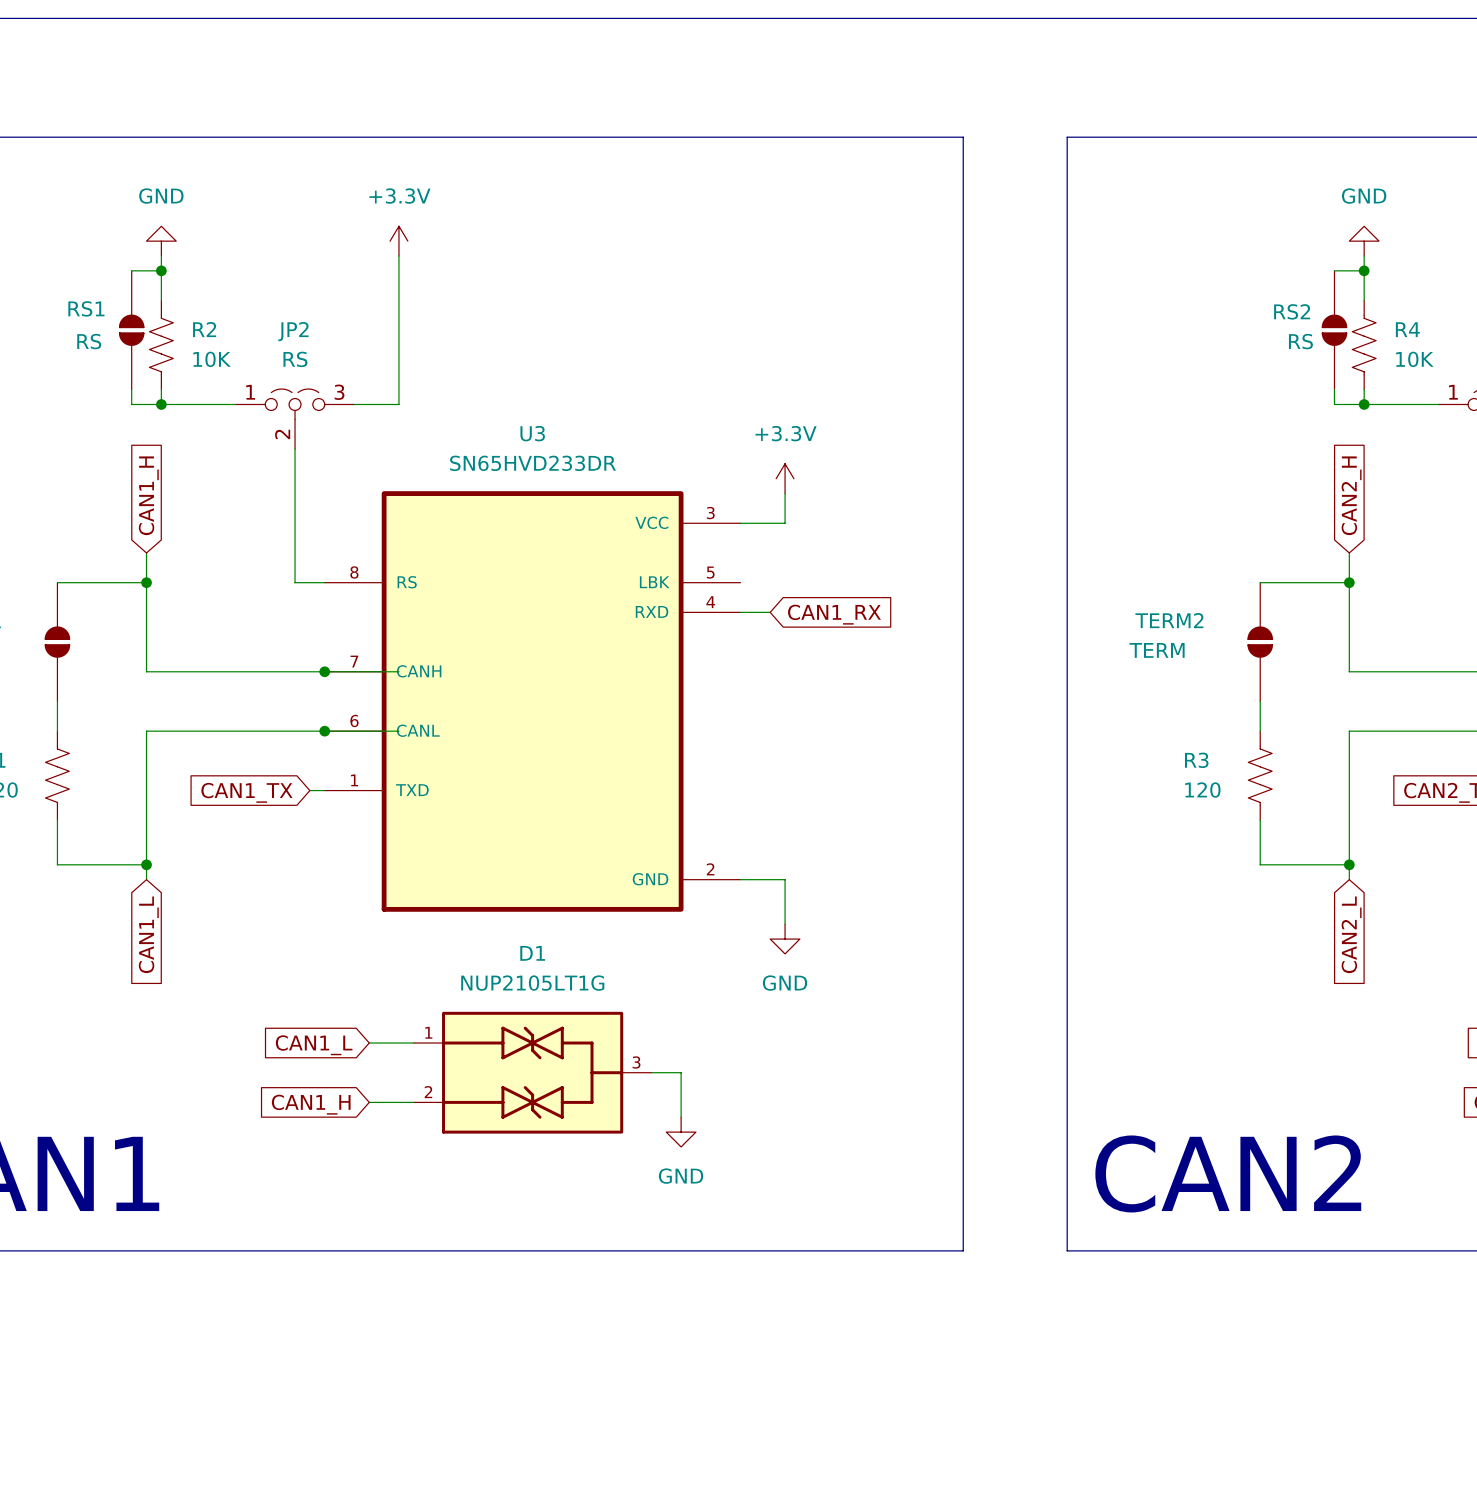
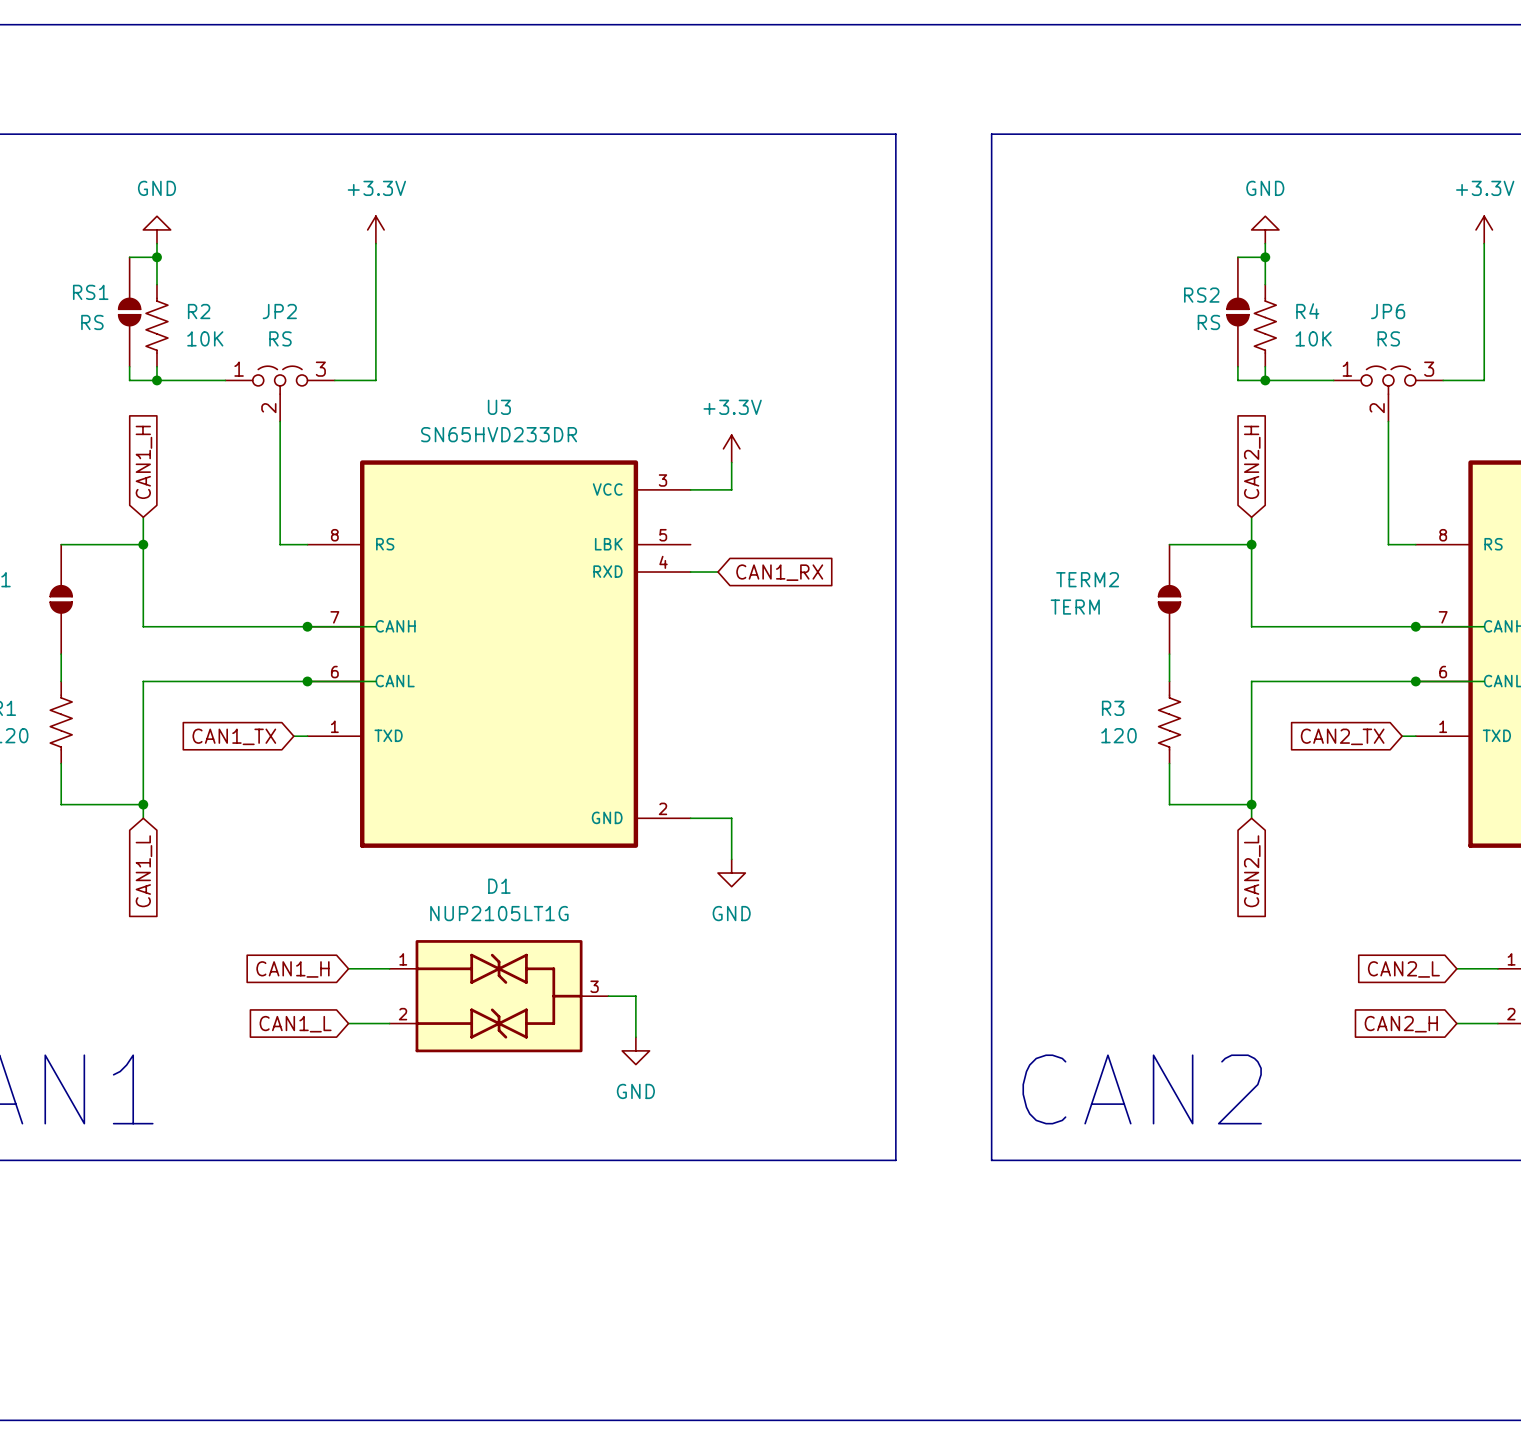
global label: CAN1_L (314, 1045) -> CAN1_H (292, 969)
global label: CAN1_H (311, 1104) -> CAN1_L (295, 1024)

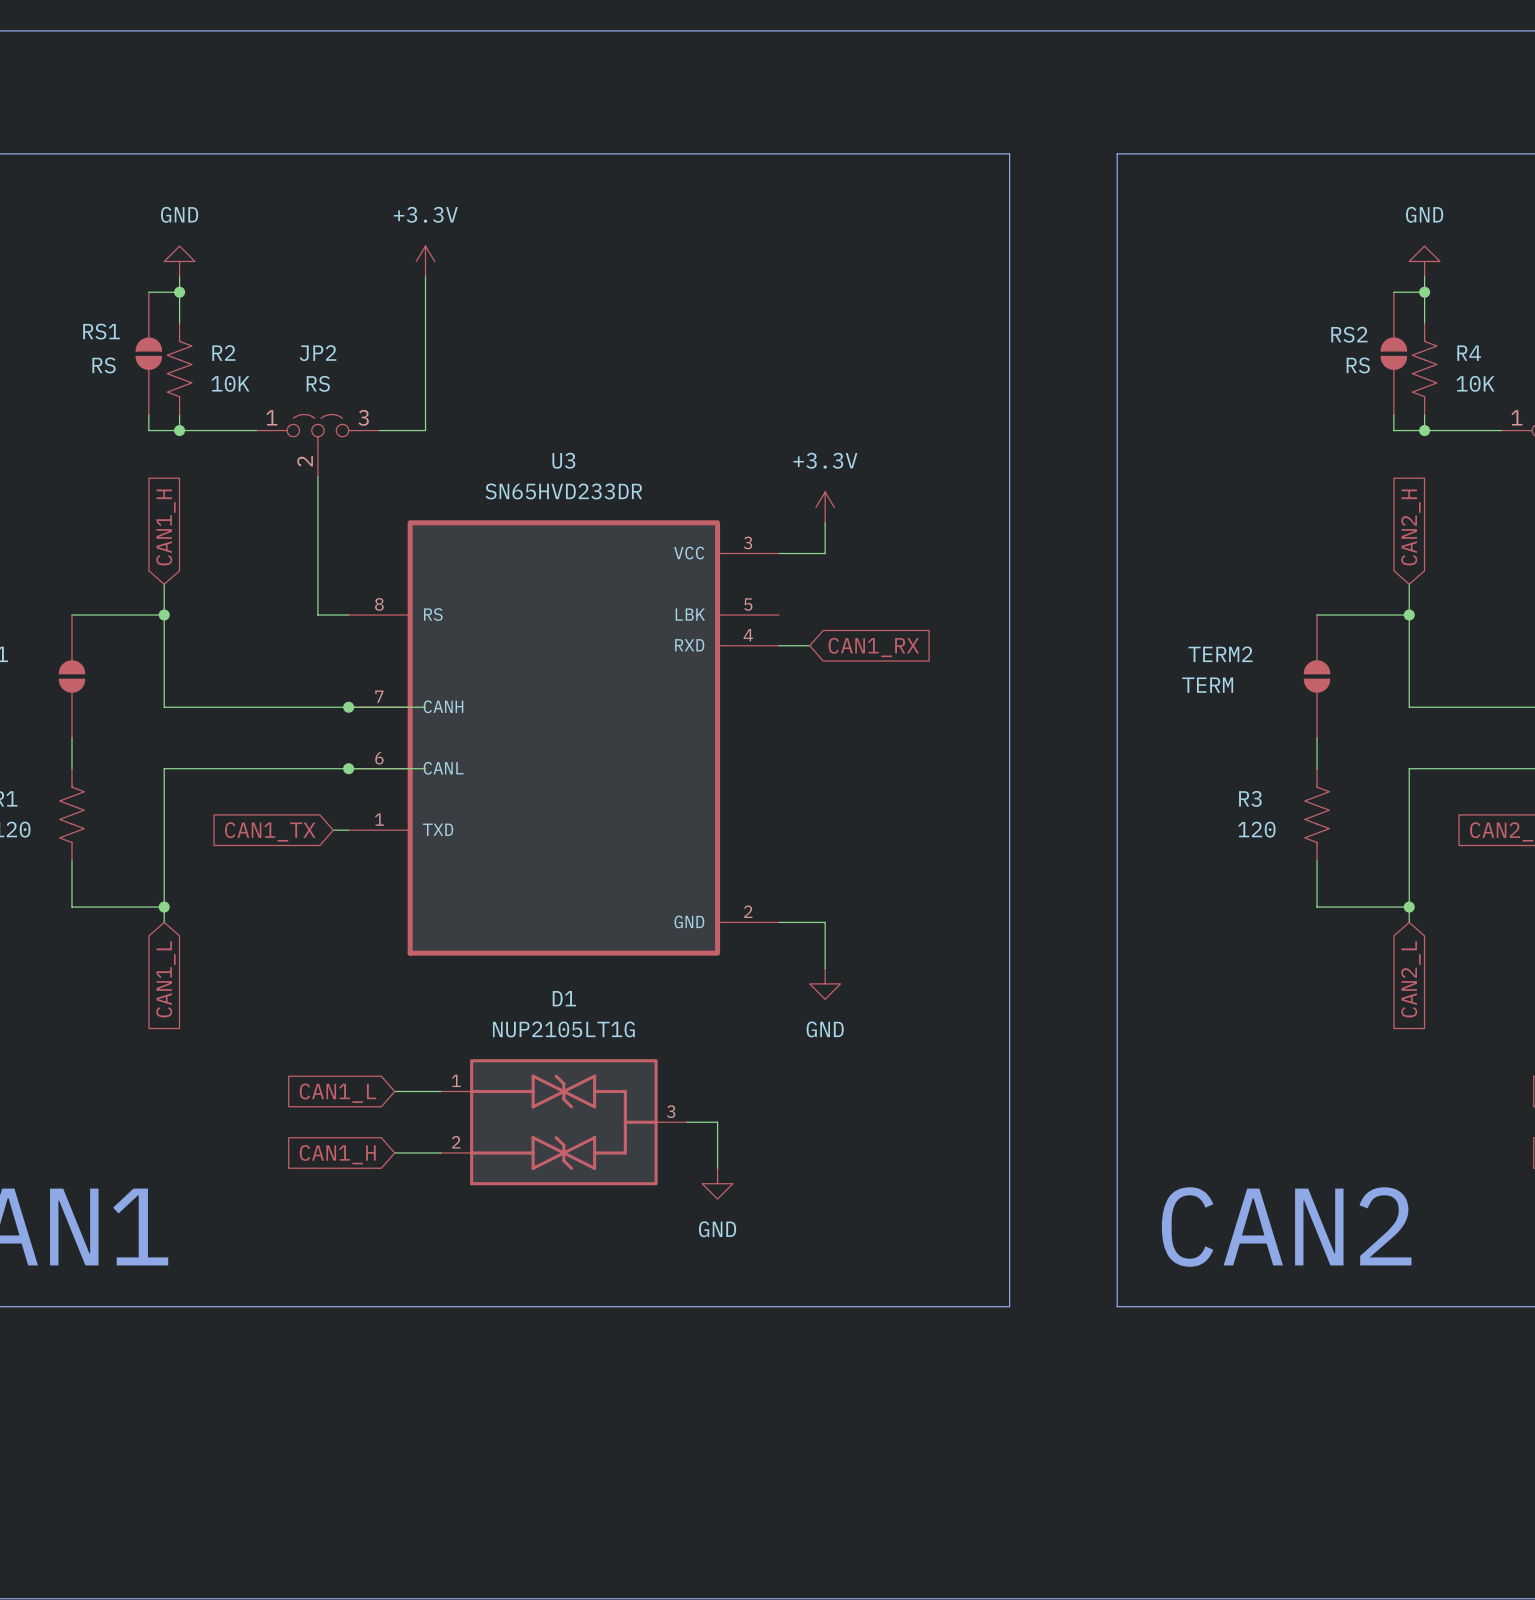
global label: CAN1_H (292, 969) -> CAN1_L (337, 1093)
global label: CAN1_L (295, 1024) -> CAN1_H (337, 1154)

